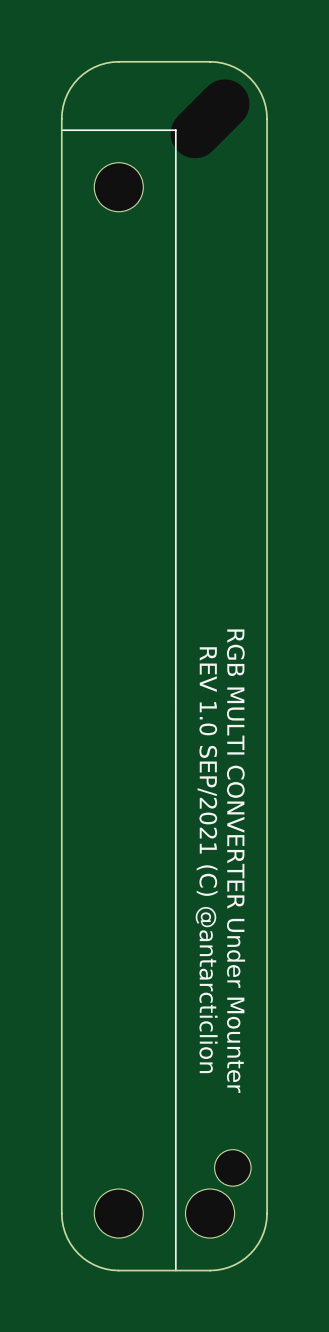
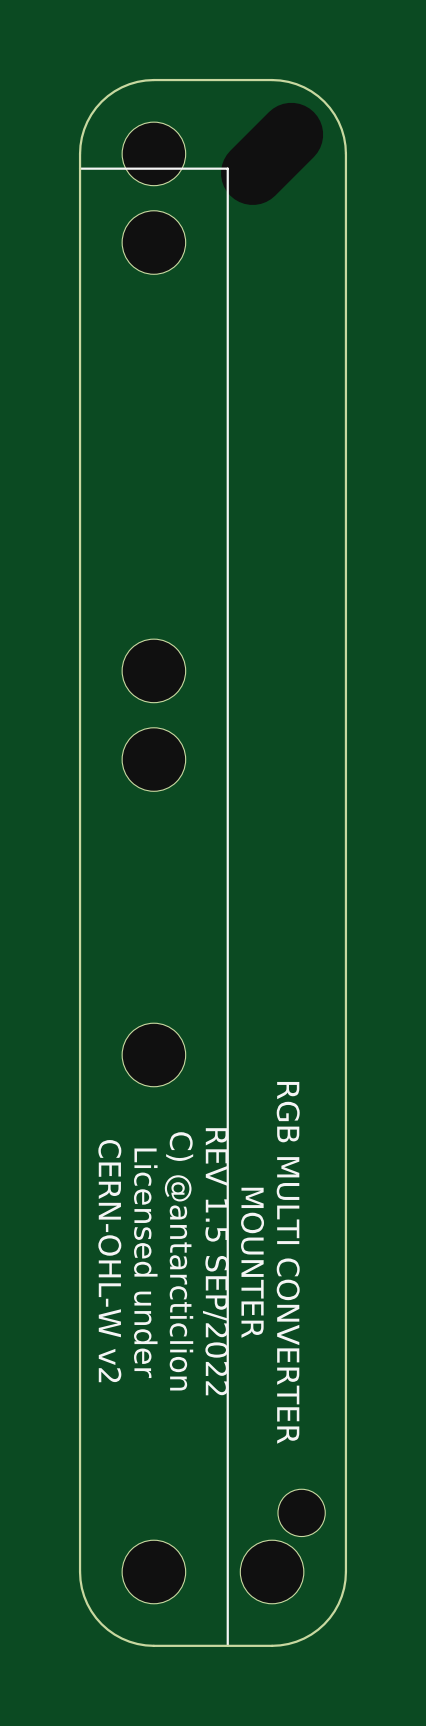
part: none -> (153, 153)
part: none -> (153, 670)
part: none -> (153, 759)
part: none -> (153, 1054)
text: REV 1.0 SEP/2021 (C) @antarcticlion (206, 860) -> none
text: RGB MULTI CONVERTER Under Mounter (236, 861) -> RGB MULTI CONVERTER (288, 1262)
text: none -> CERN-OHL-W v2 (109, 1261)
text: none -> C) @antarcticlion (179, 1261)
text: none -> REV 1.5 SEP/2022 (215, 1261)
text: none -> MOUNTER (252, 1262)
text: none -> Licensed under (145, 1263)

